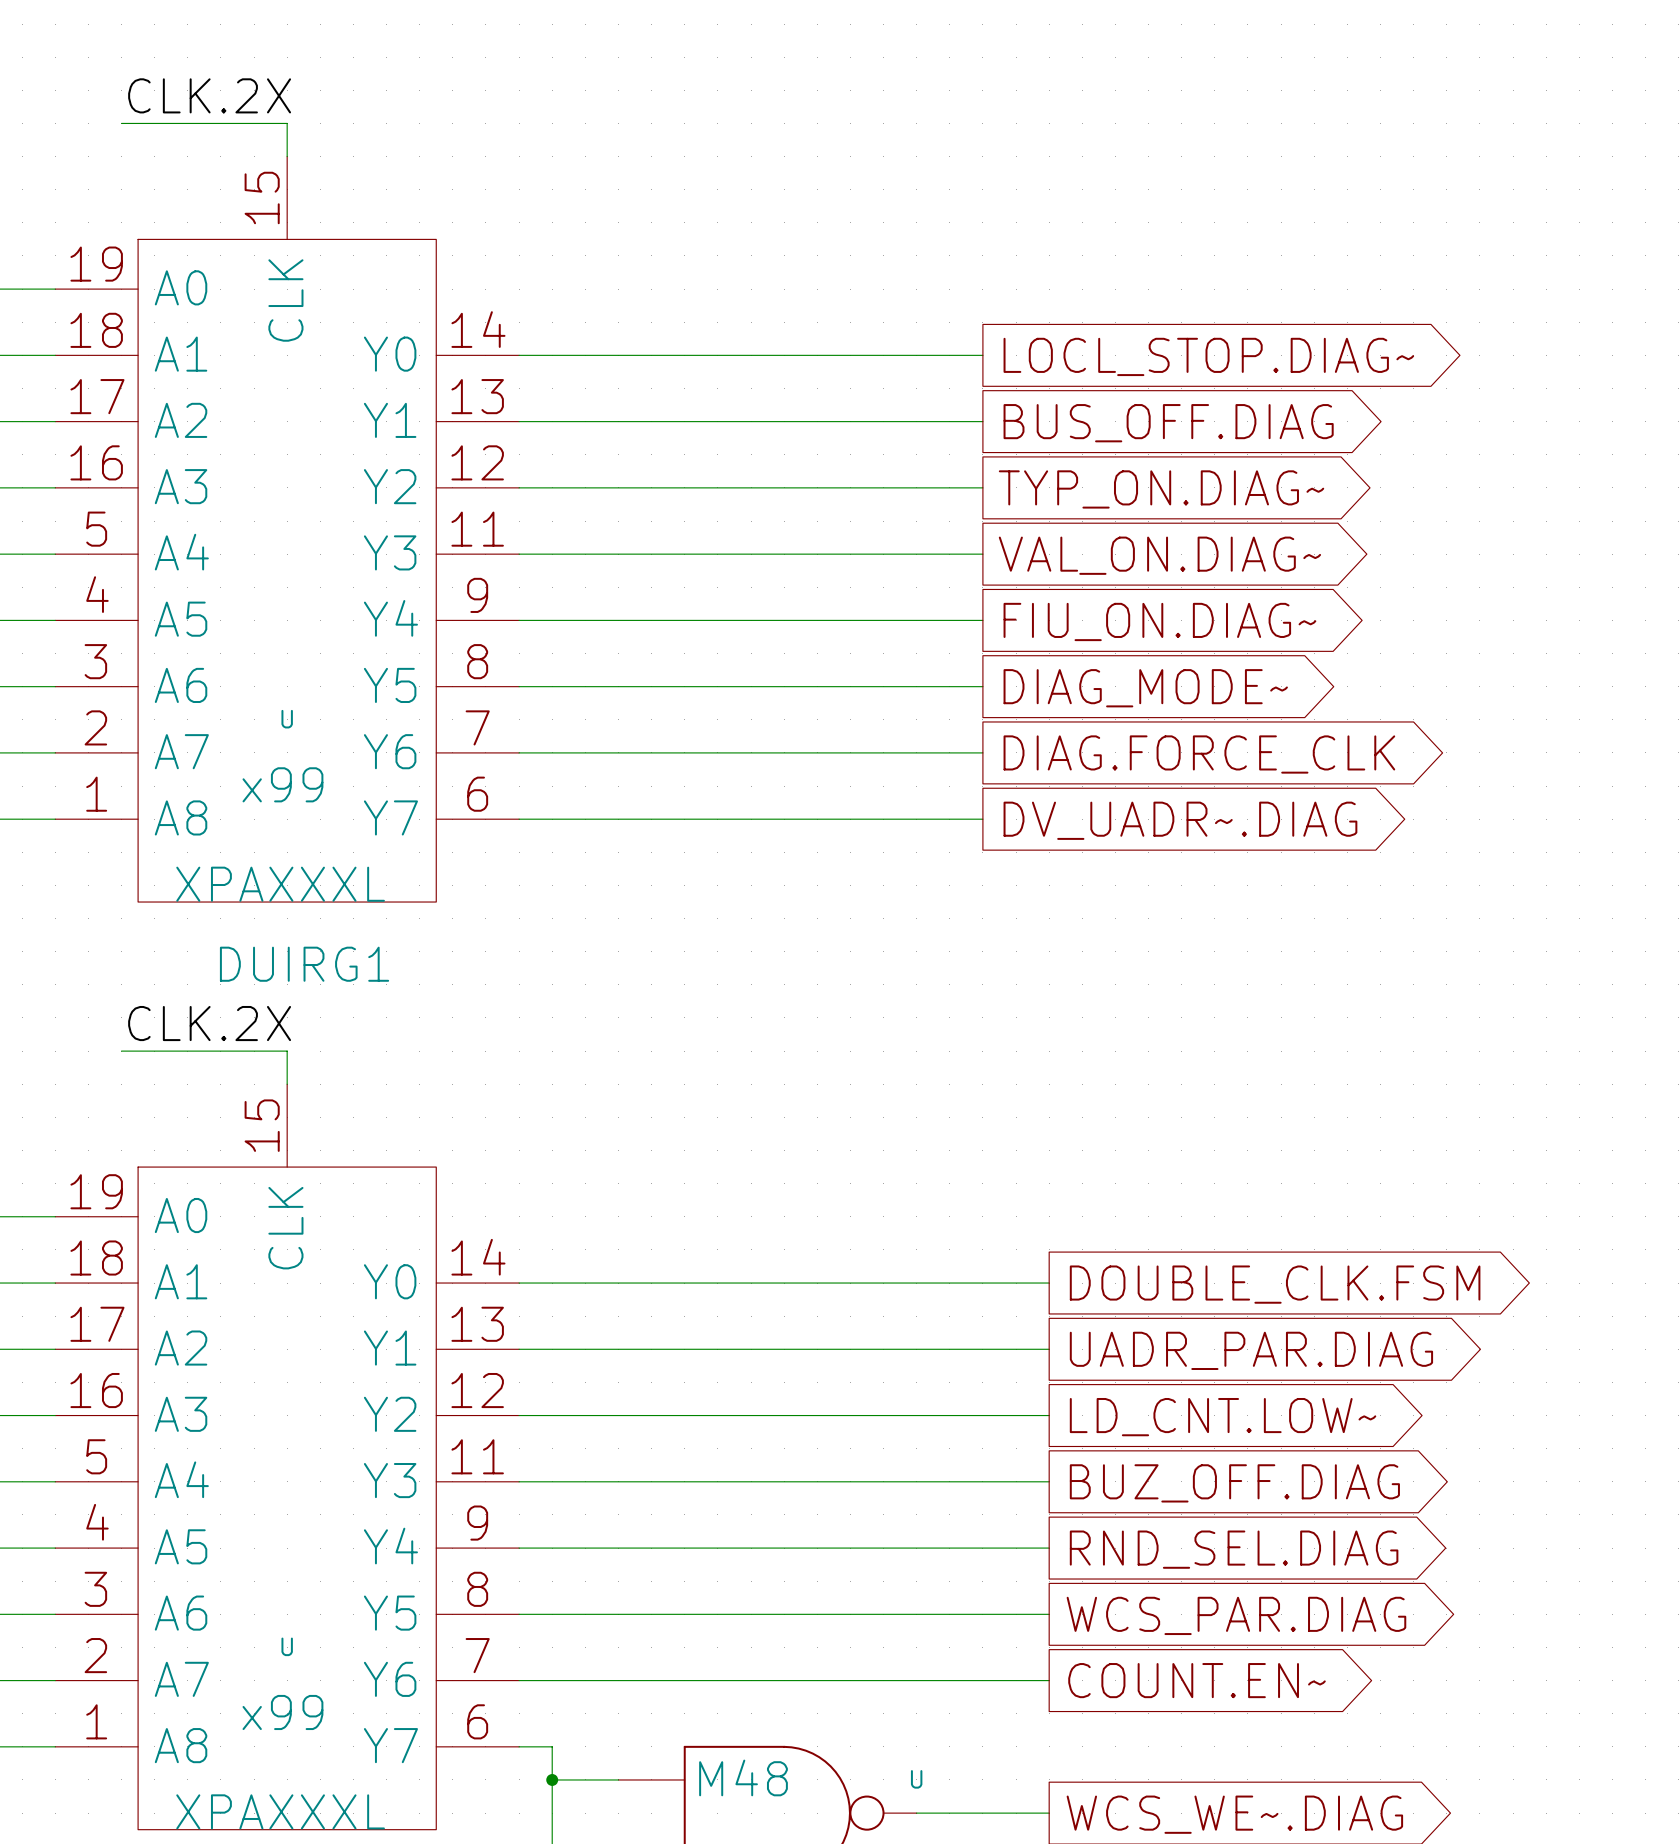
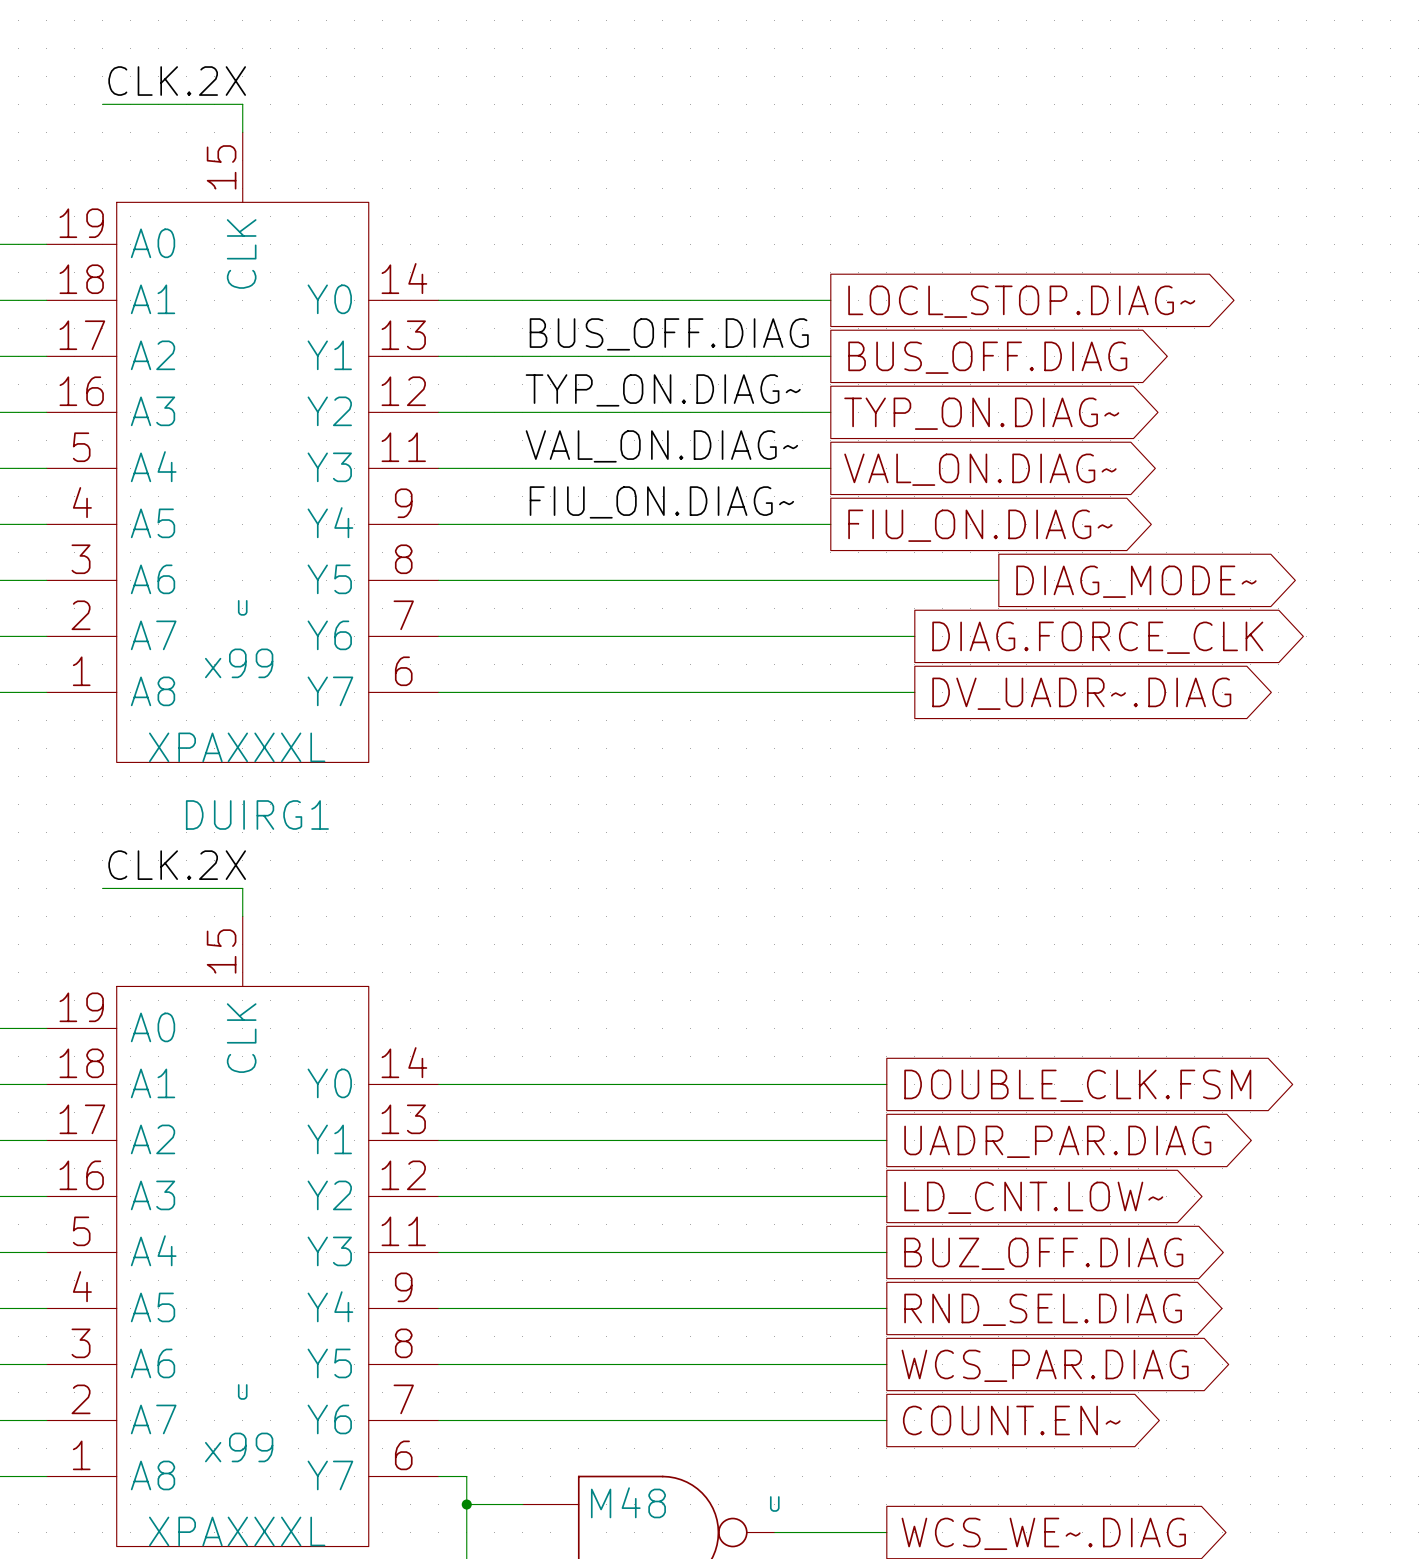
label: none -> BUS_OFF.DIAG (669, 334)
label: none -> TYP_ON.DIAG~ (663, 390)
label: none -> VAL_ON.DIAG~ (661, 446)
label: none -> FIU_ON.DIAG~ (661, 502)
wire: none -> (830, 580) (998, 580)
global label position: DIAG_MODE~ (1145, 688) -> DIAG_MODE~ (1136, 581)
wire: none -> (830, 636) (914, 636)
global label position: DIAG.FORCE_CLK (1199, 754) -> DIAG.FORCE_CLK (1097, 637)
wire: none -> (830, 692) (914, 692)
global label position: DV_UADR~.DIAG (1180, 820) -> DV_UADR~.DIAG (1081, 693)

